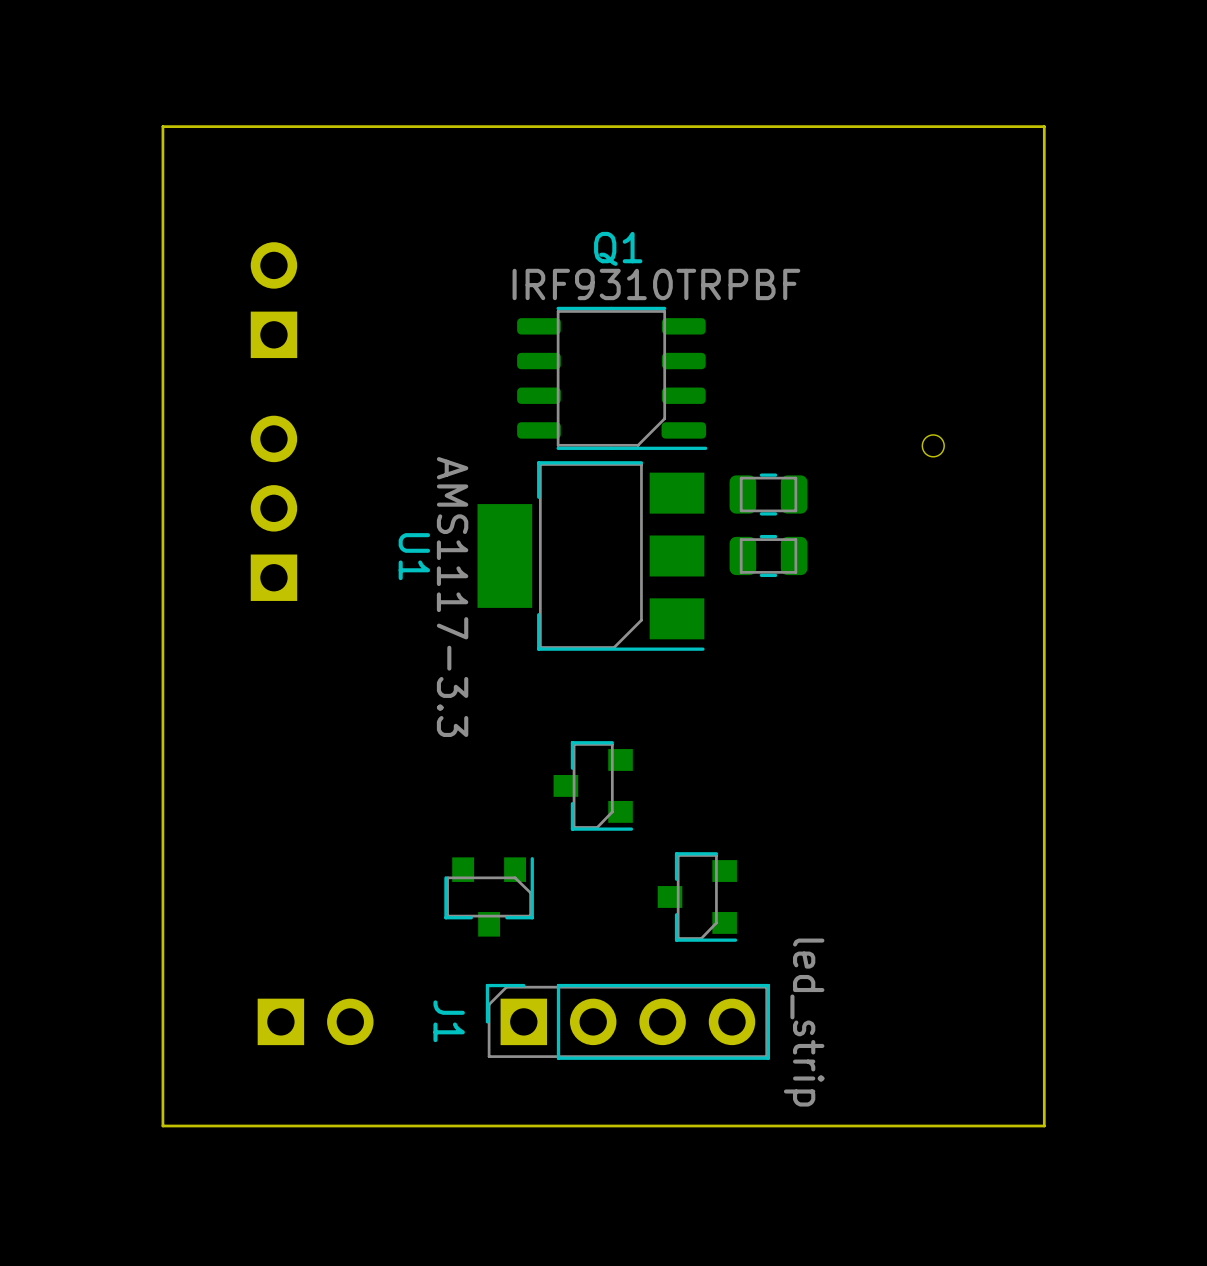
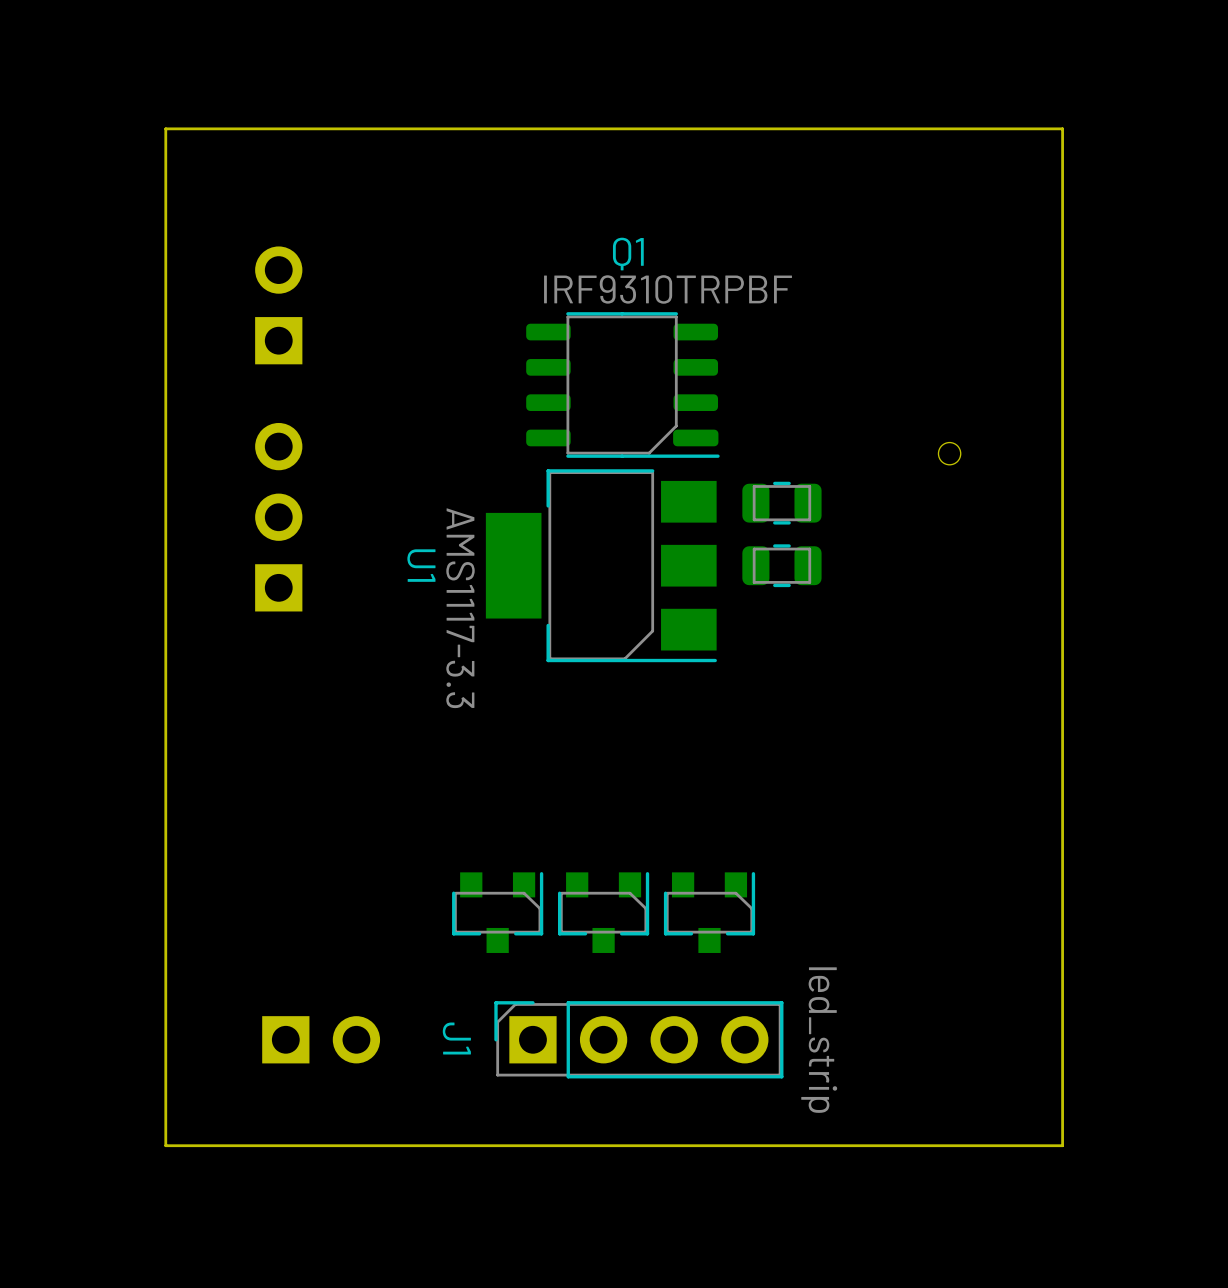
part rotation: 0° (593, 785) -> 90° counterclockwise (603, 912)
part position: (593, 785) -> (603, 912)
part rotation: 0° (697, 896) -> 90° counterclockwise (709, 912)

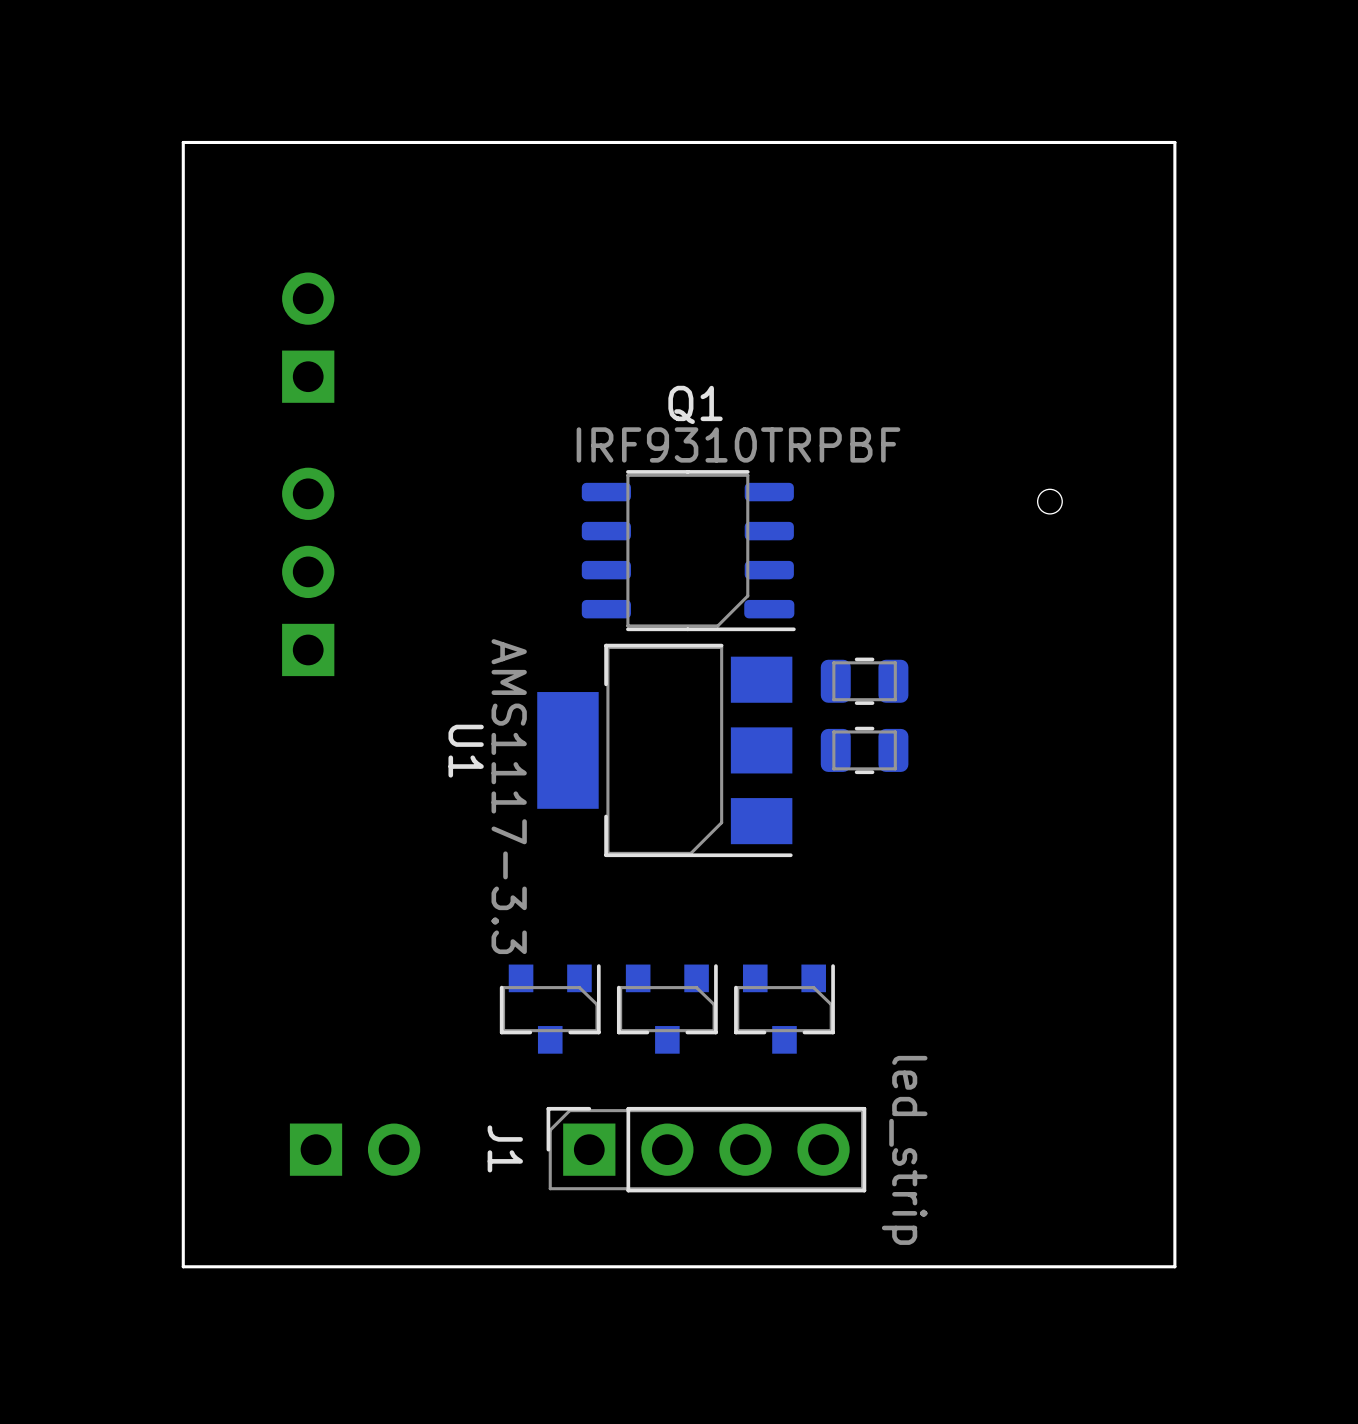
Q1 position: (622, 385) -> (688, 550)
part: (781, 503) -> none
U1 position: (601, 565) -> (664, 750)
part position: (781, 565) -> (864, 681)
part: none -> (864, 750)

